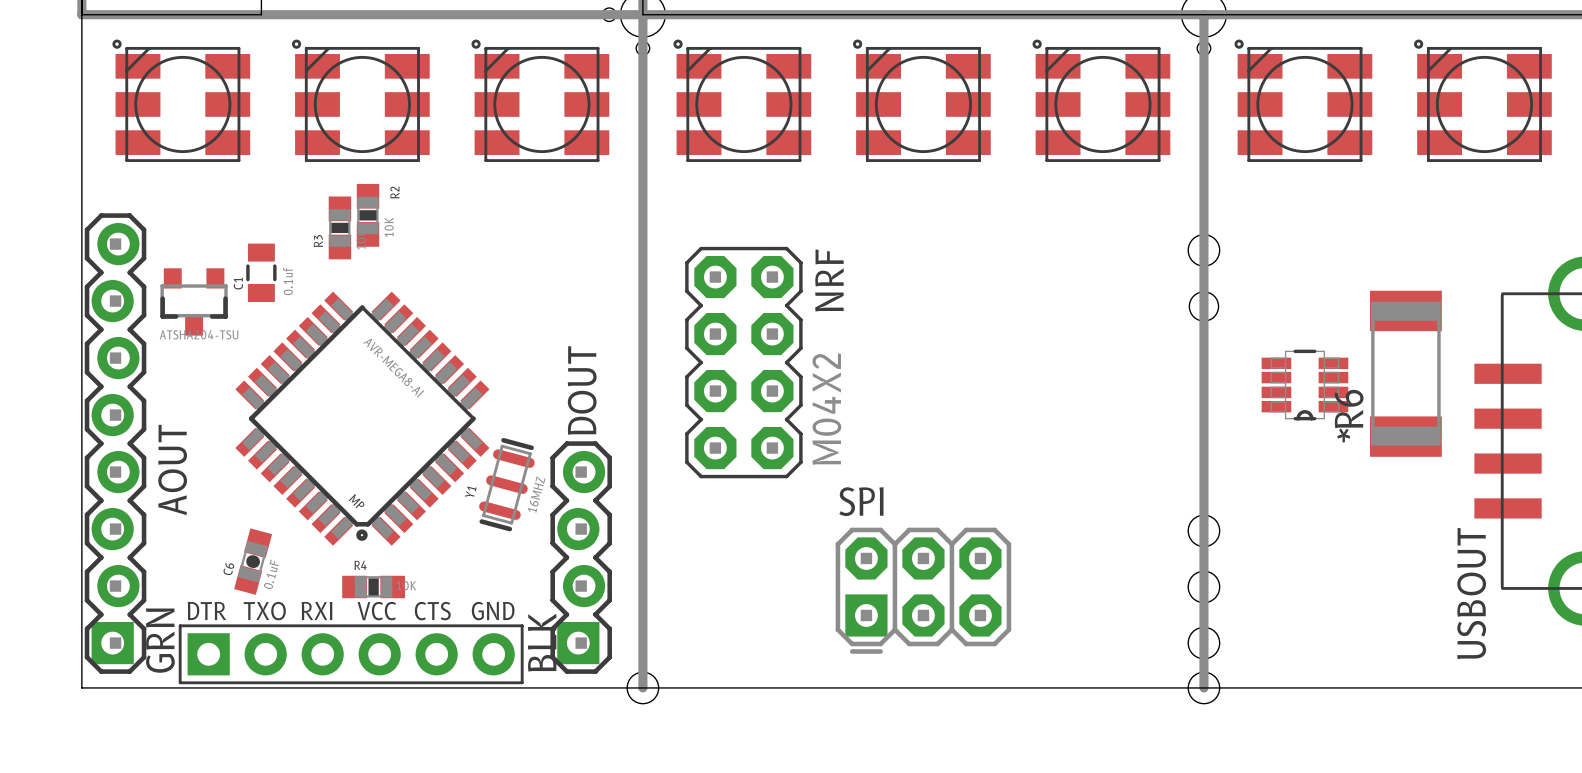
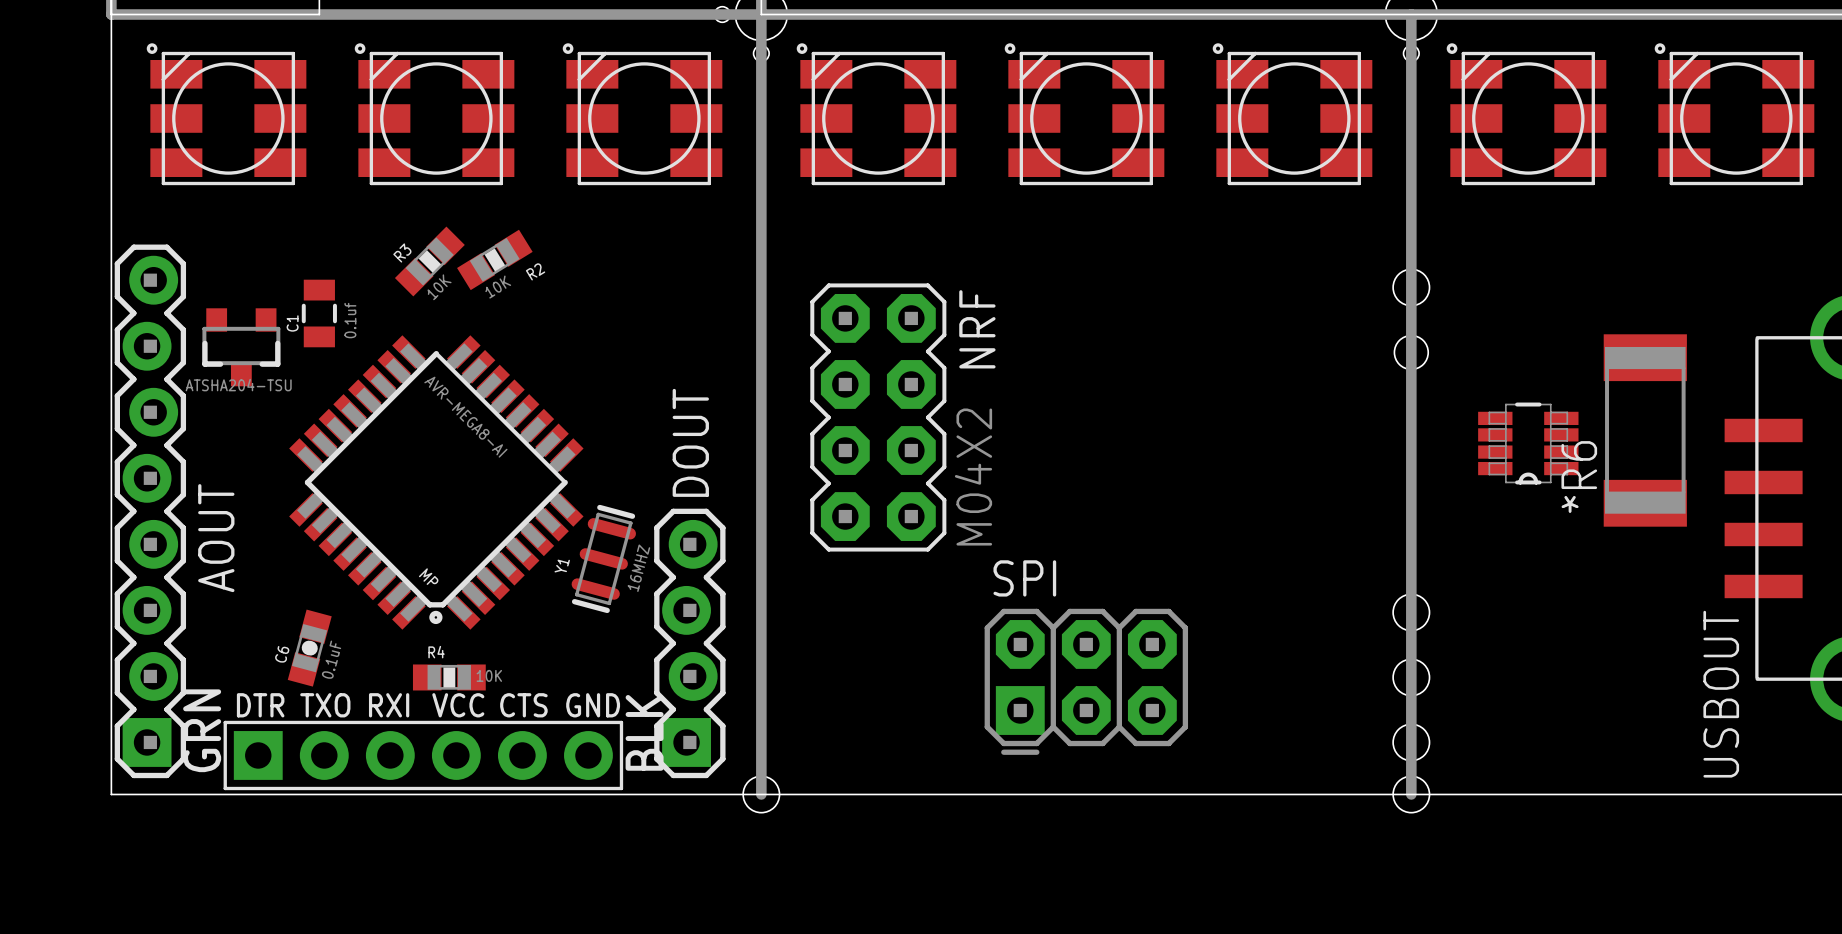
R2 rotation: 0° (368, 215) -> 58.3° clockwise (494, 259)
R2 position: (368, 215) -> (494, 259)
R3 rotation: 0° (339, 227) -> 45° clockwise (429, 261)

